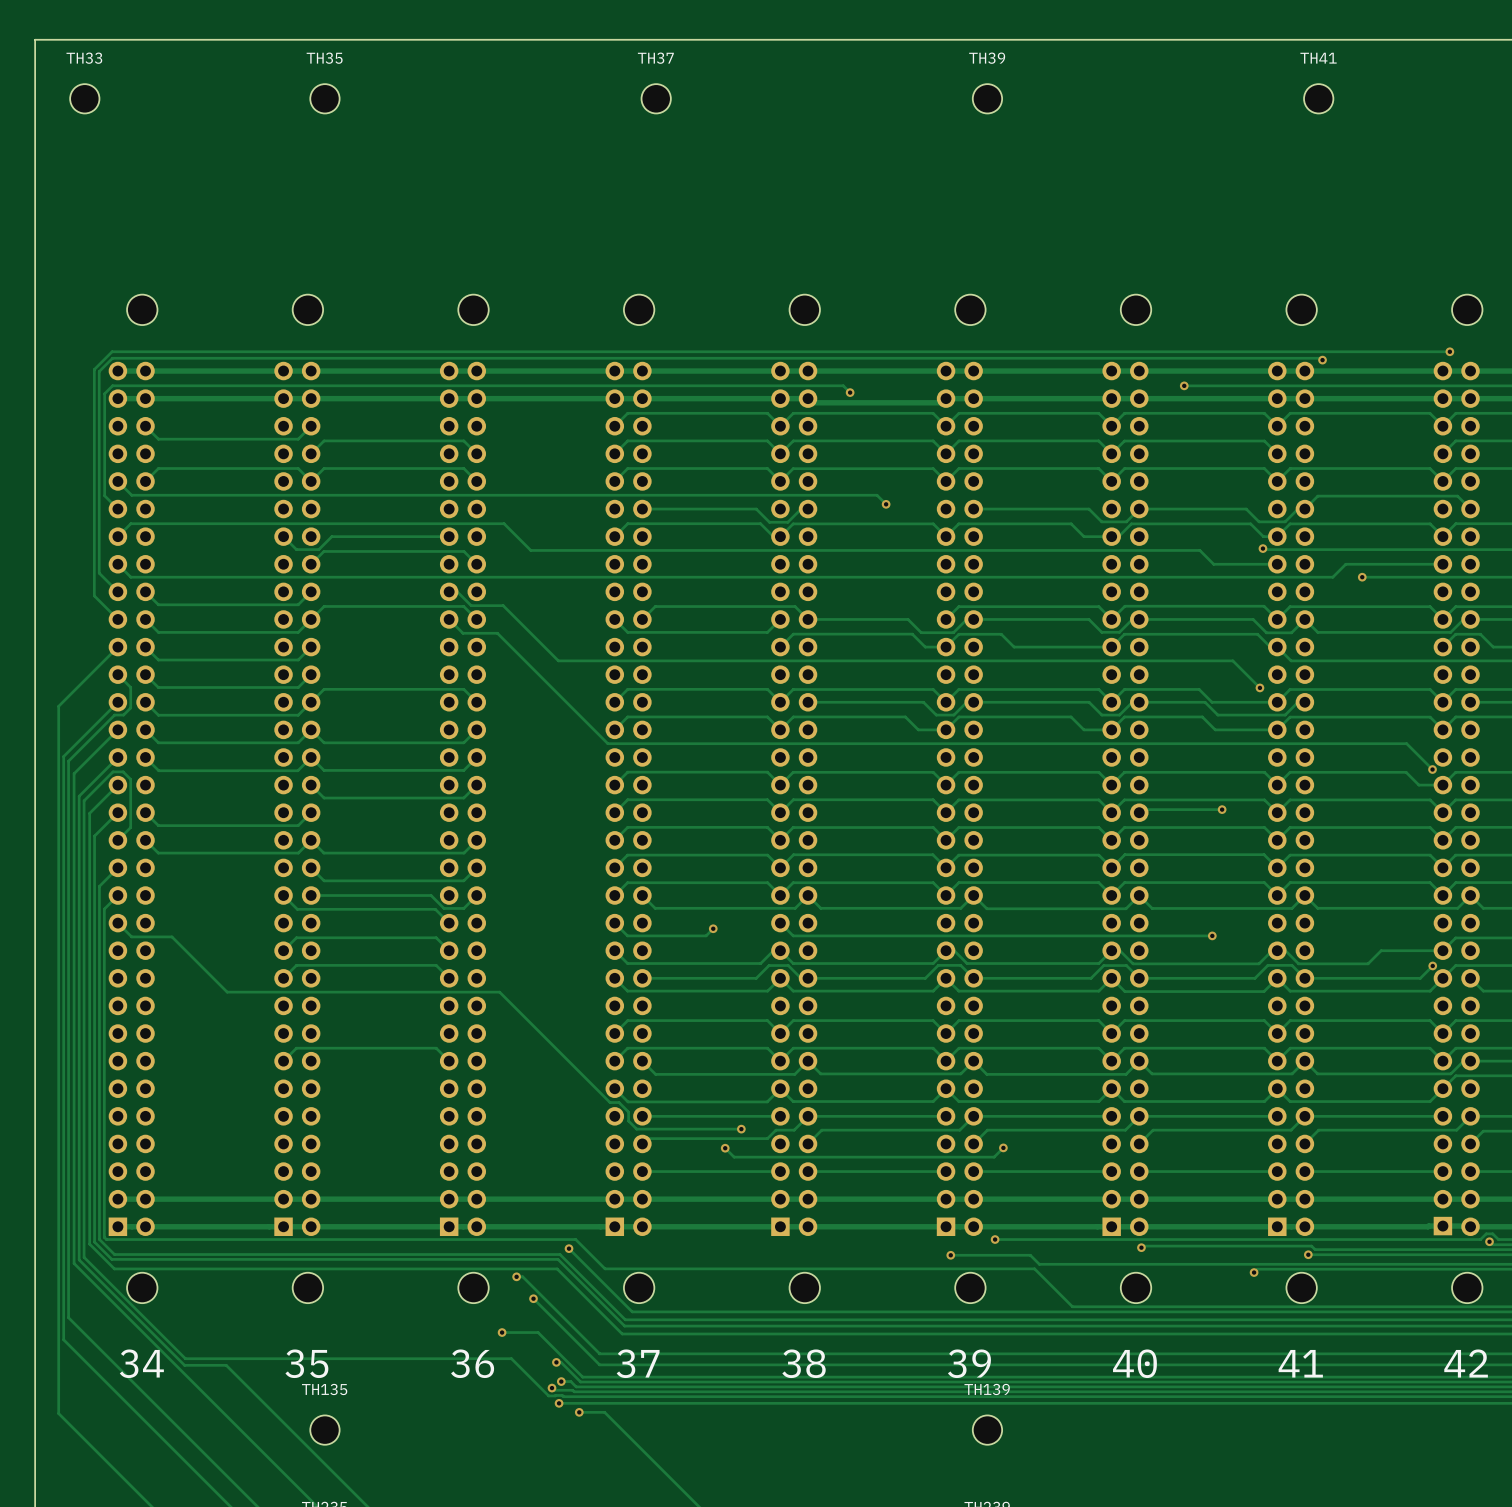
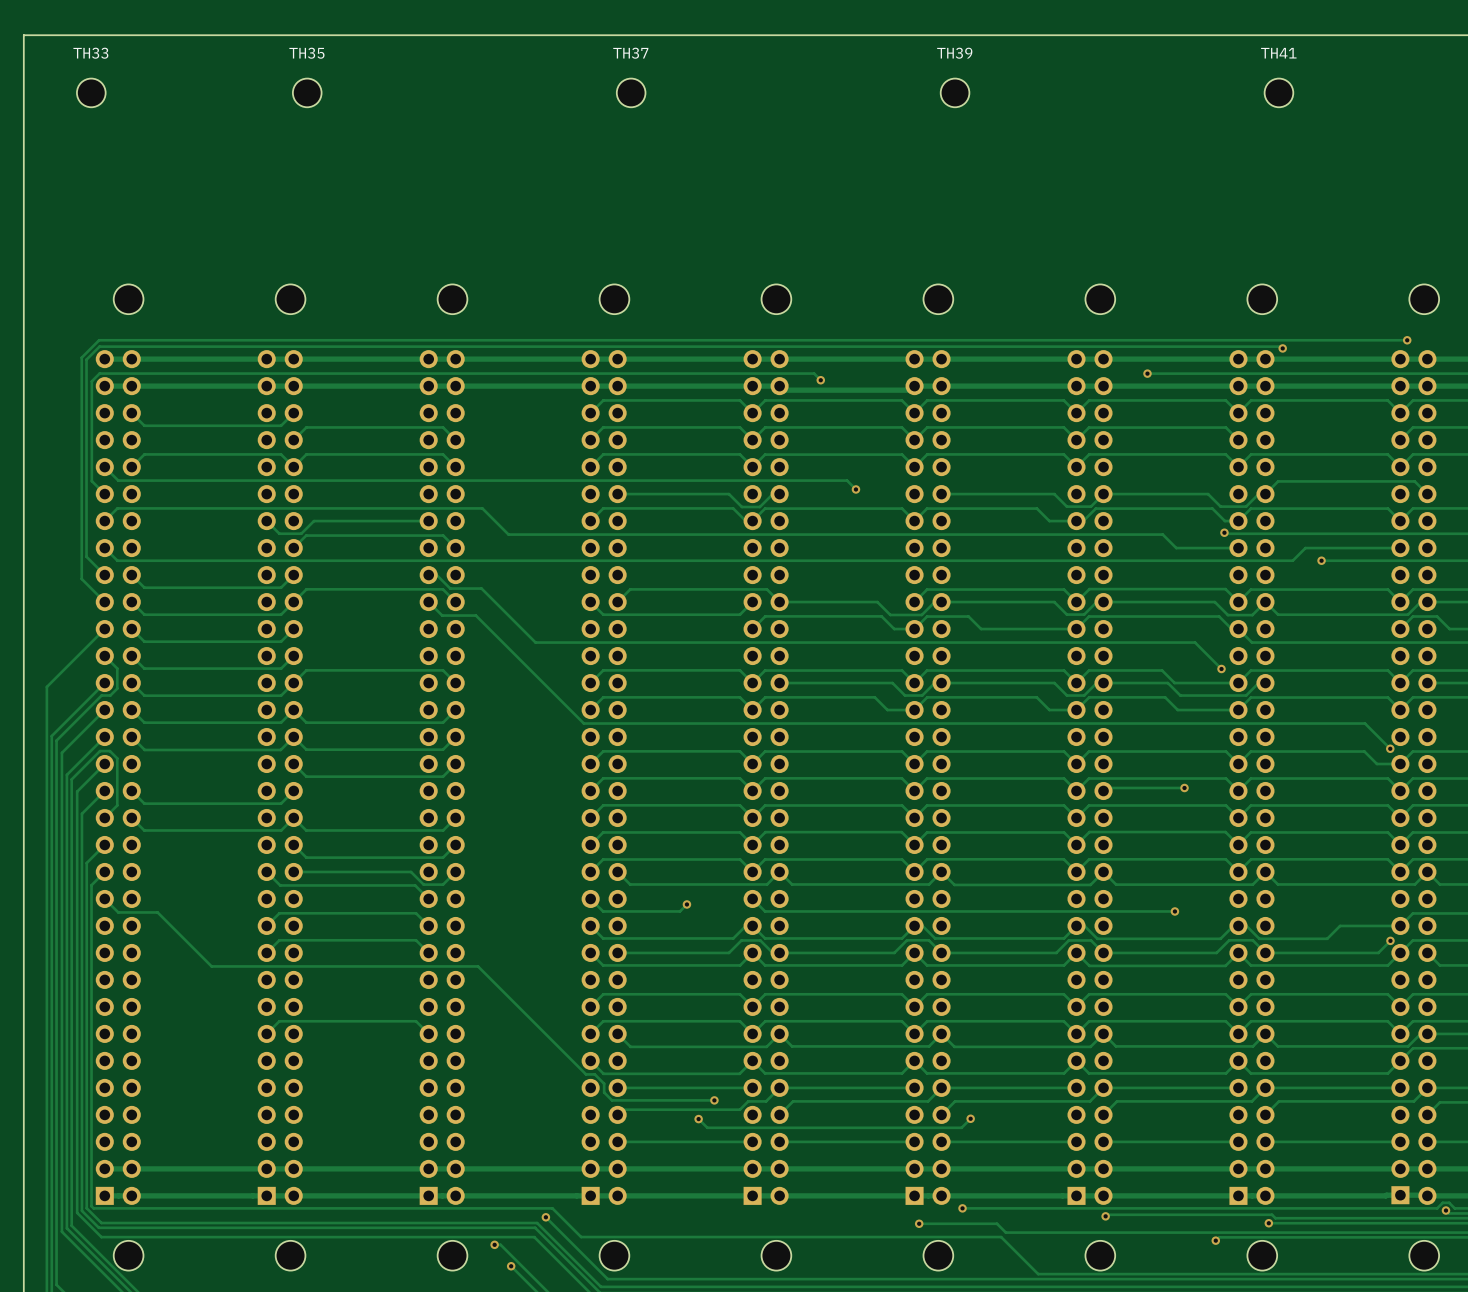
TH33 position: (84, 98) -> (91, 92)

